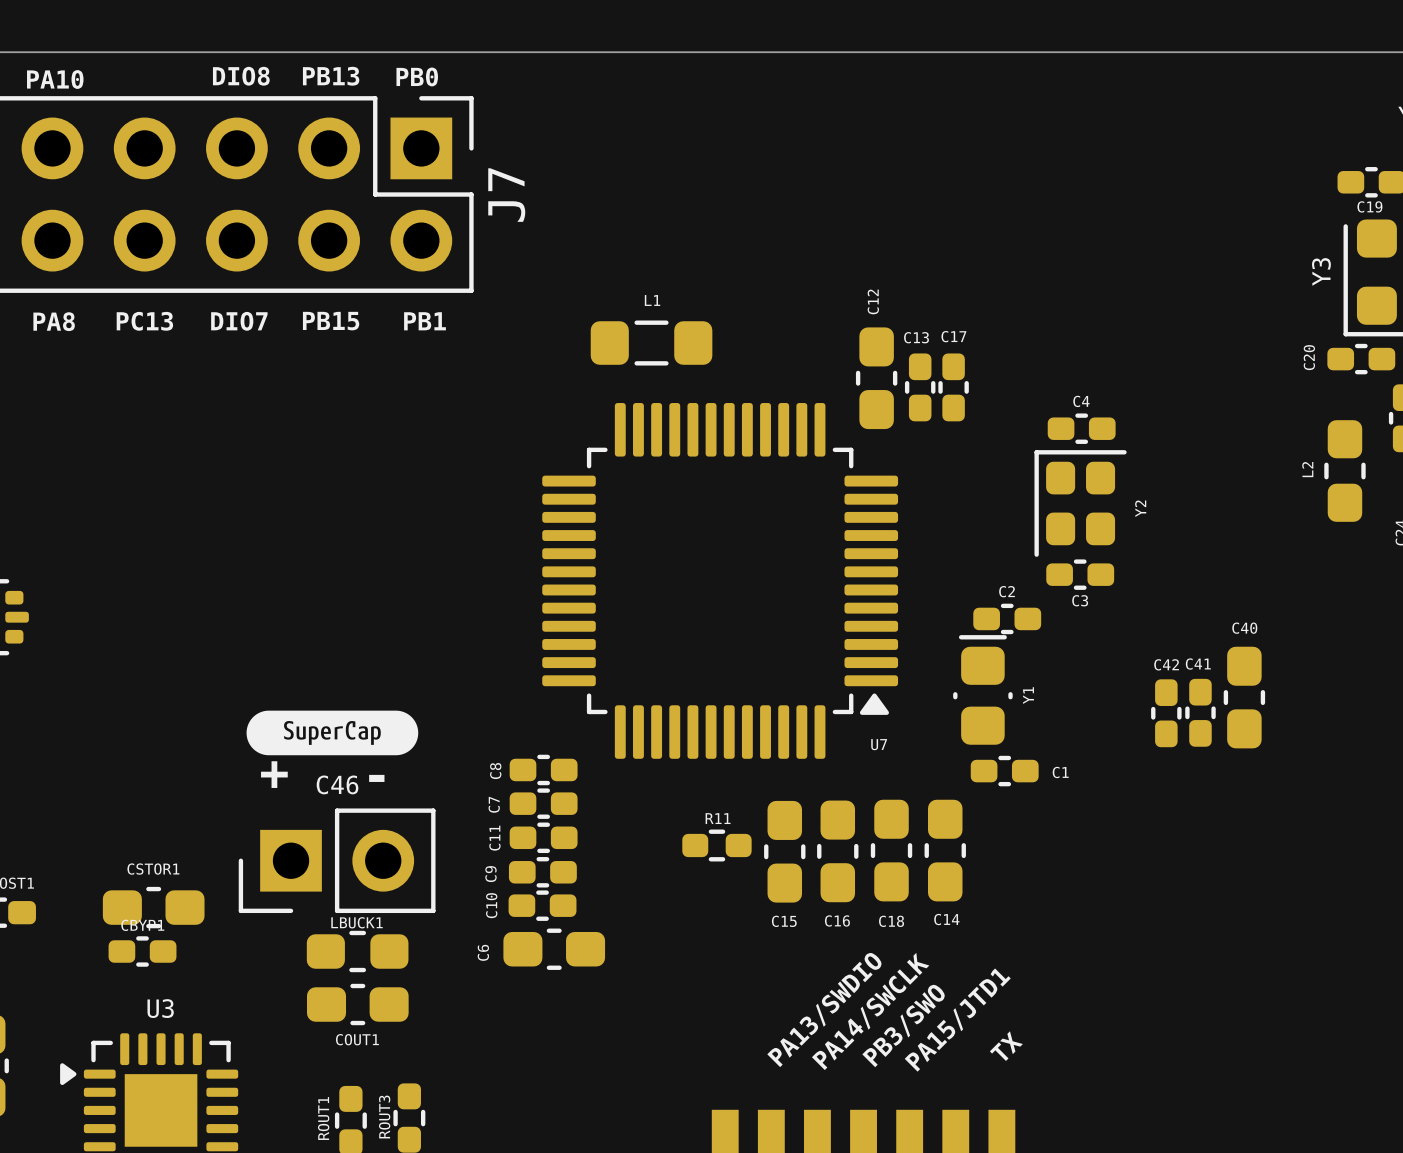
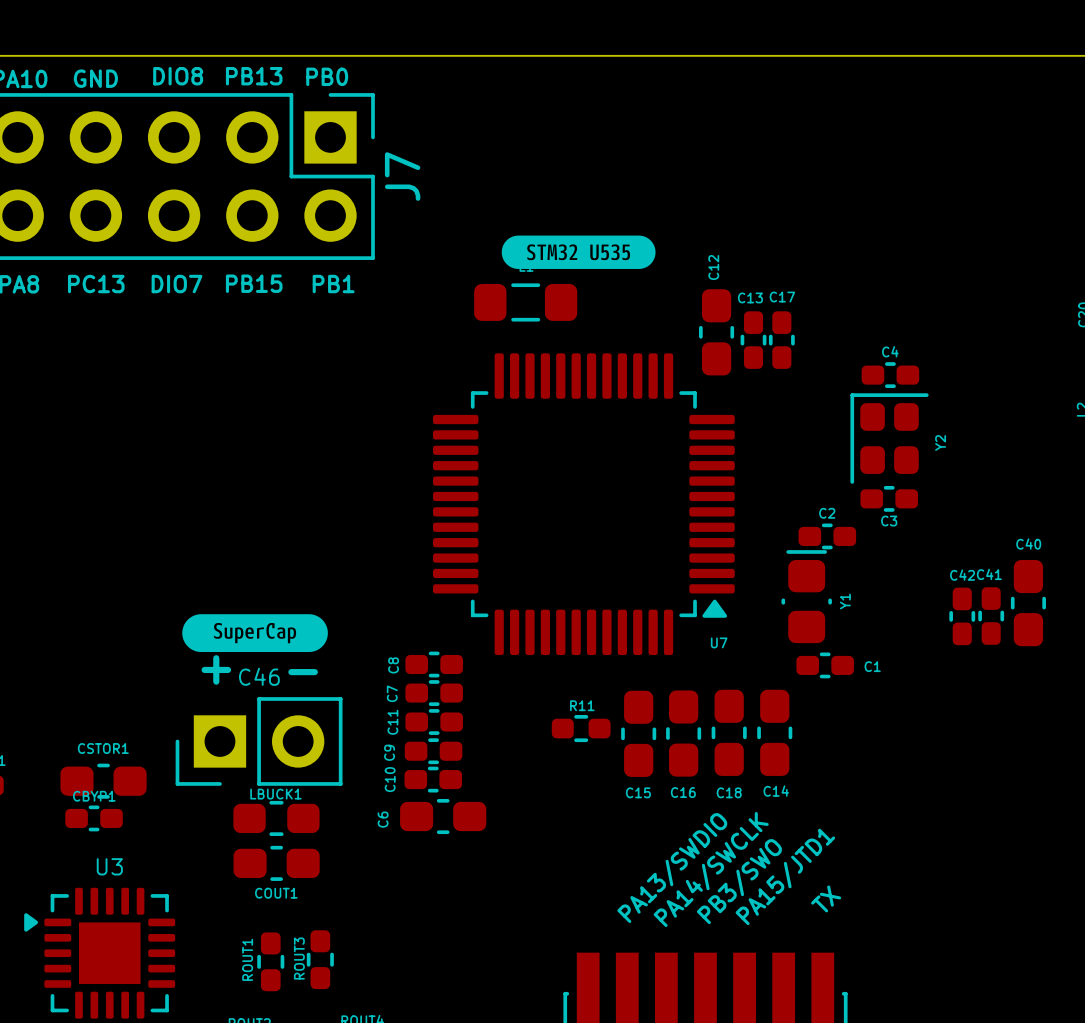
text: none -> GND (95, 78)
drawing: none -> [501, 235, 656, 269]

